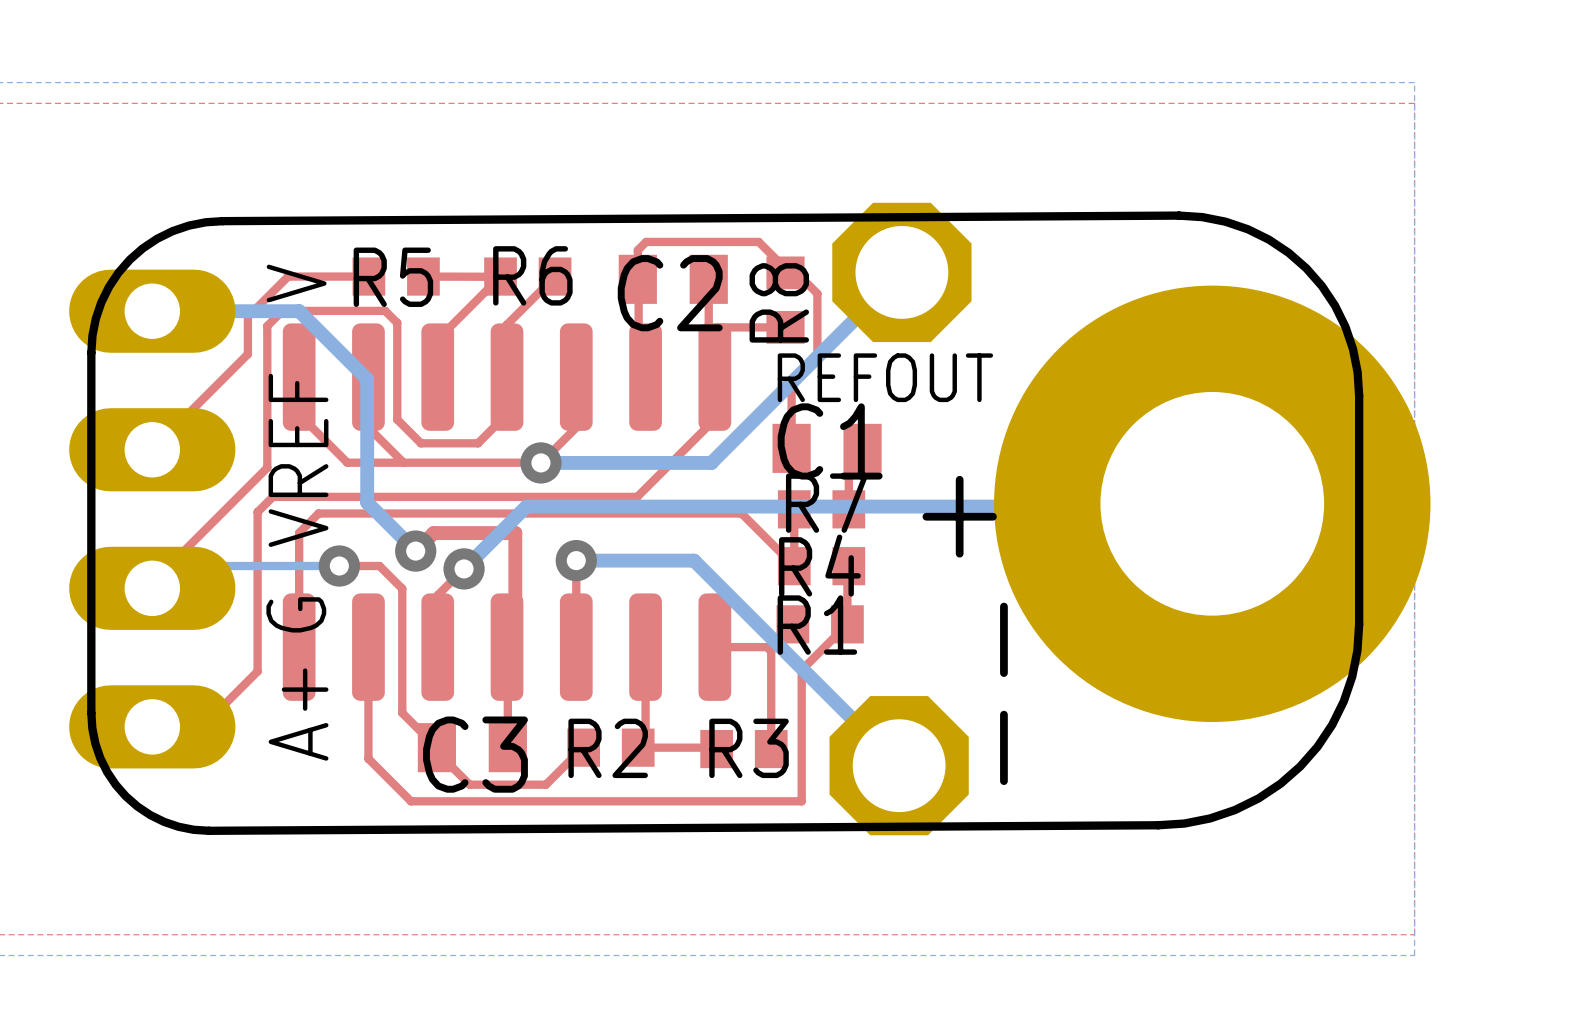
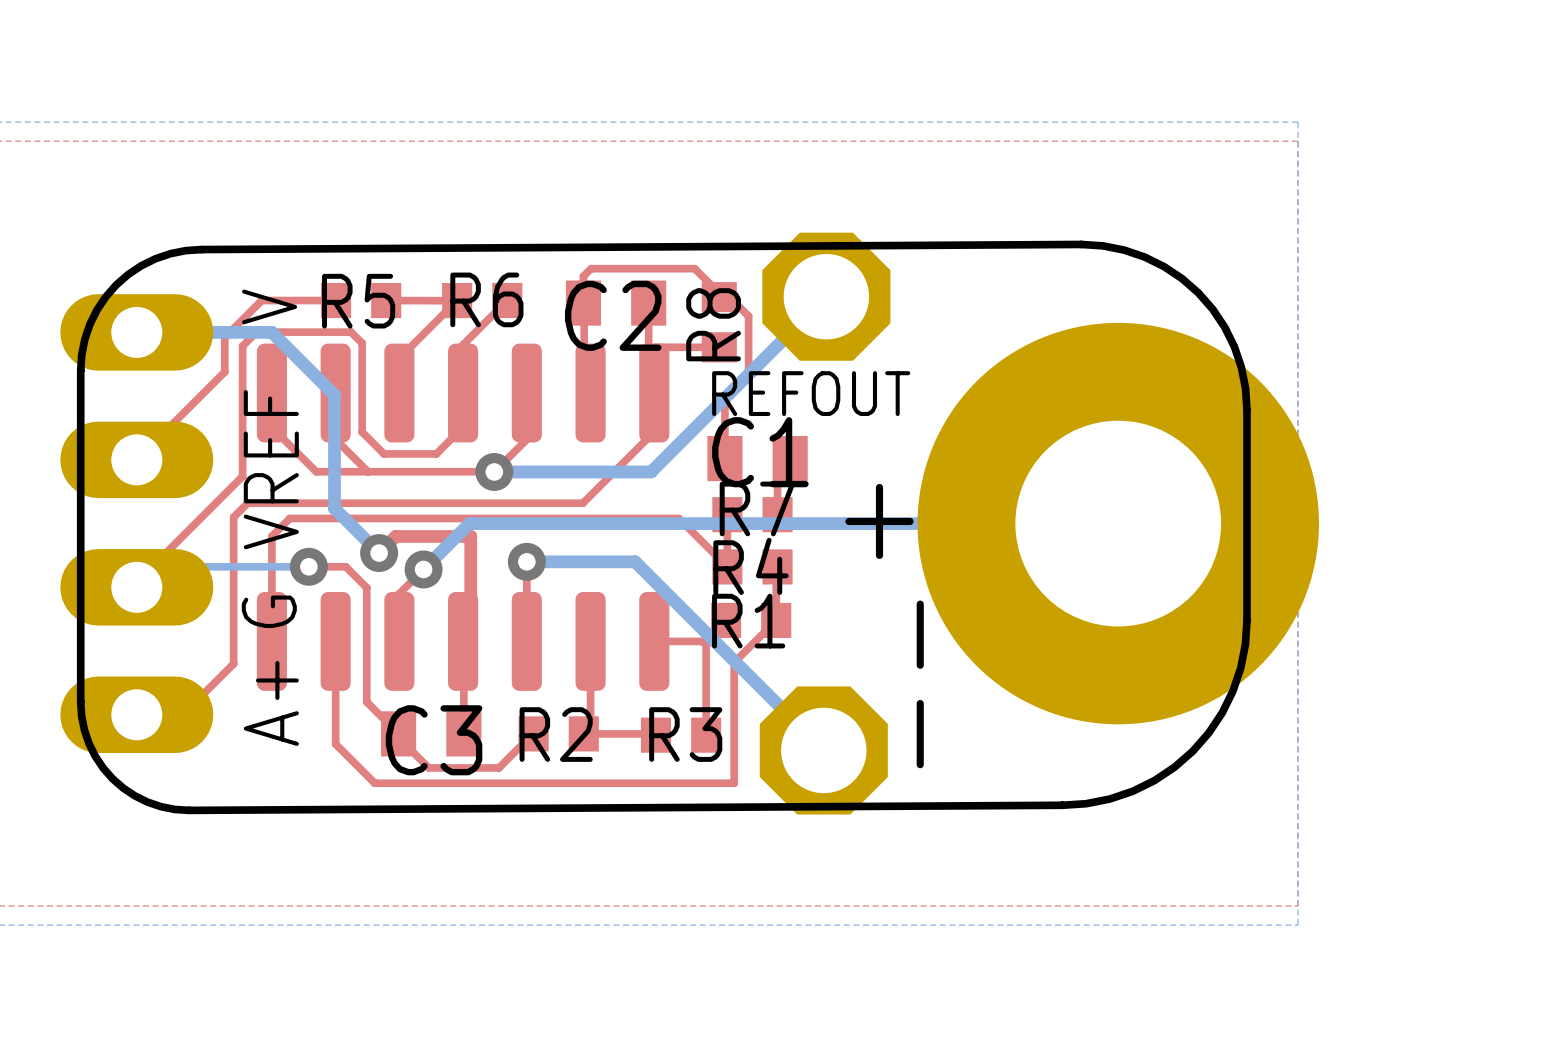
bottom track: (1212, 503) (1209, 506) (526, 506) (513, 519) -> (1118, 523) (469, 523)
part position: (1212, 503) -> (1118, 523)

